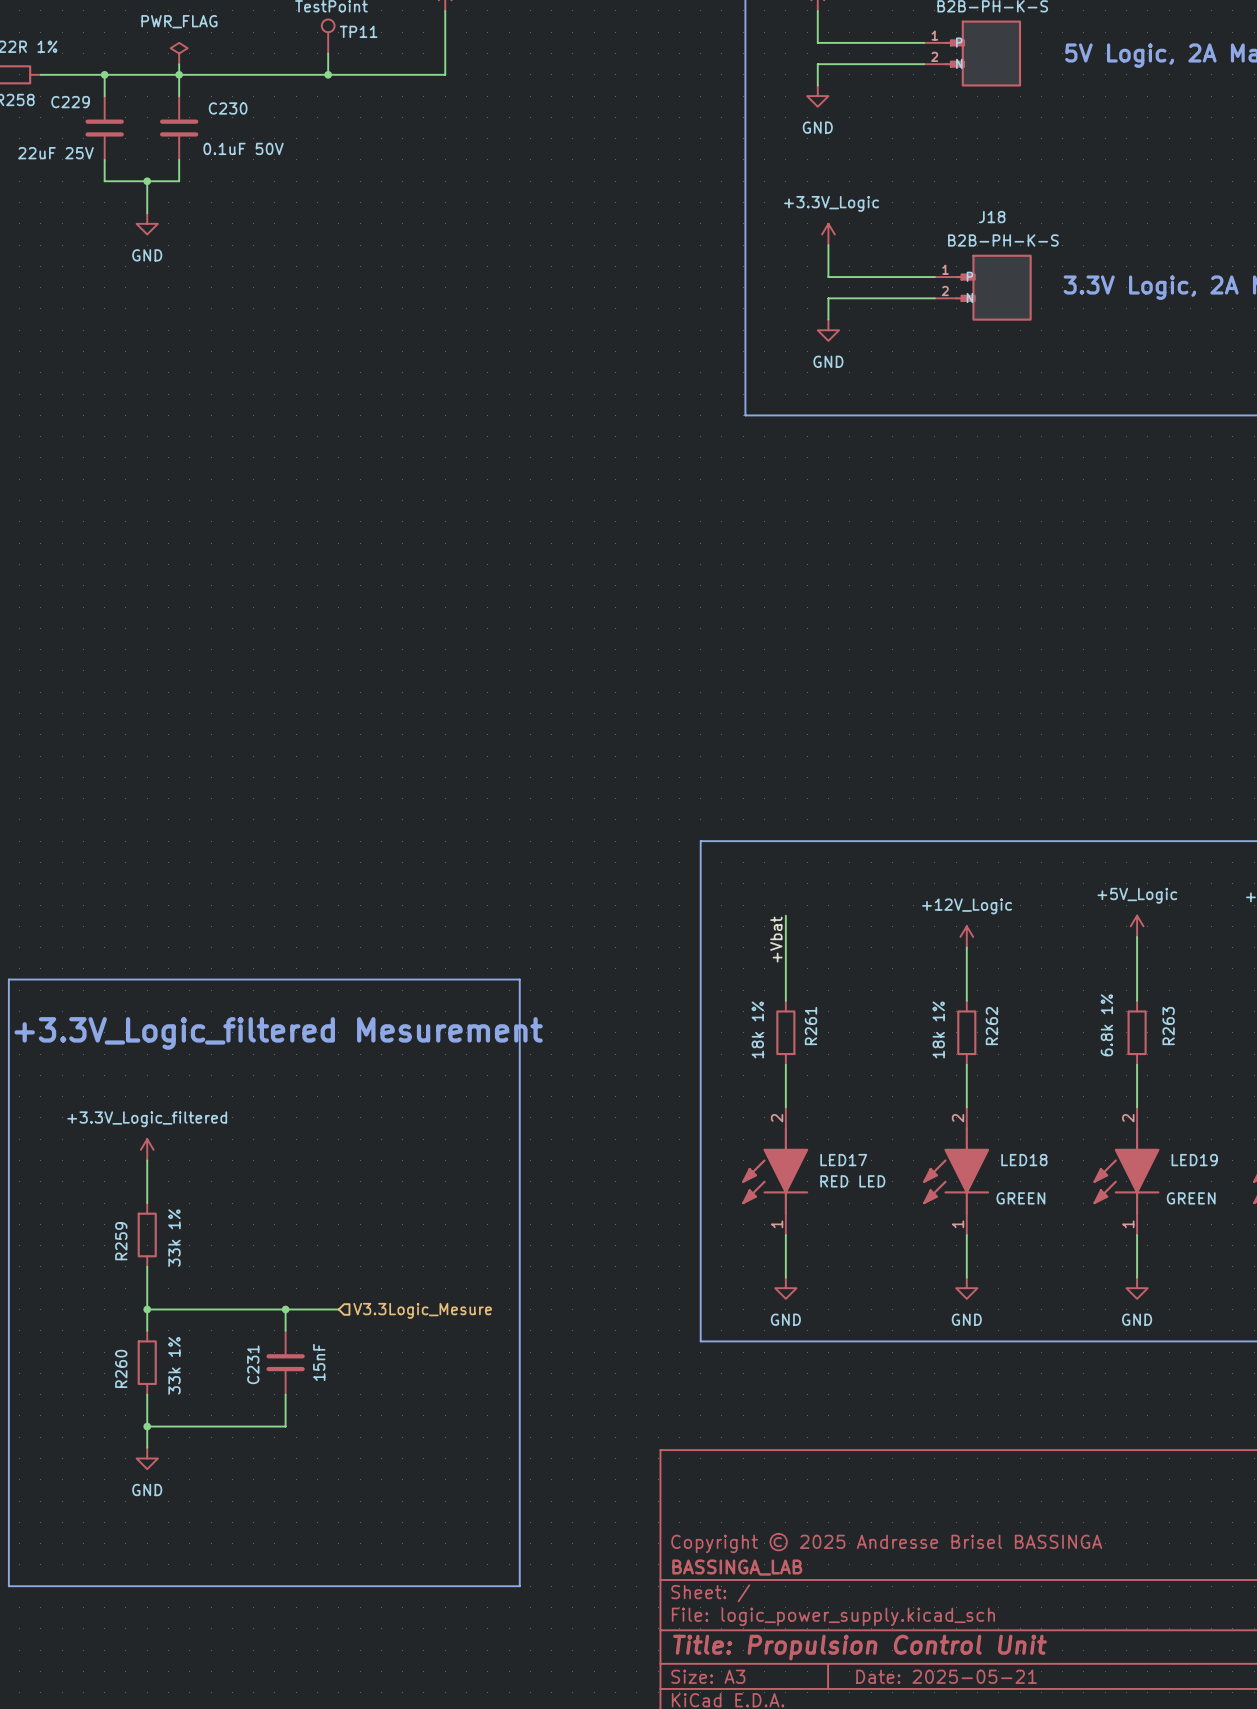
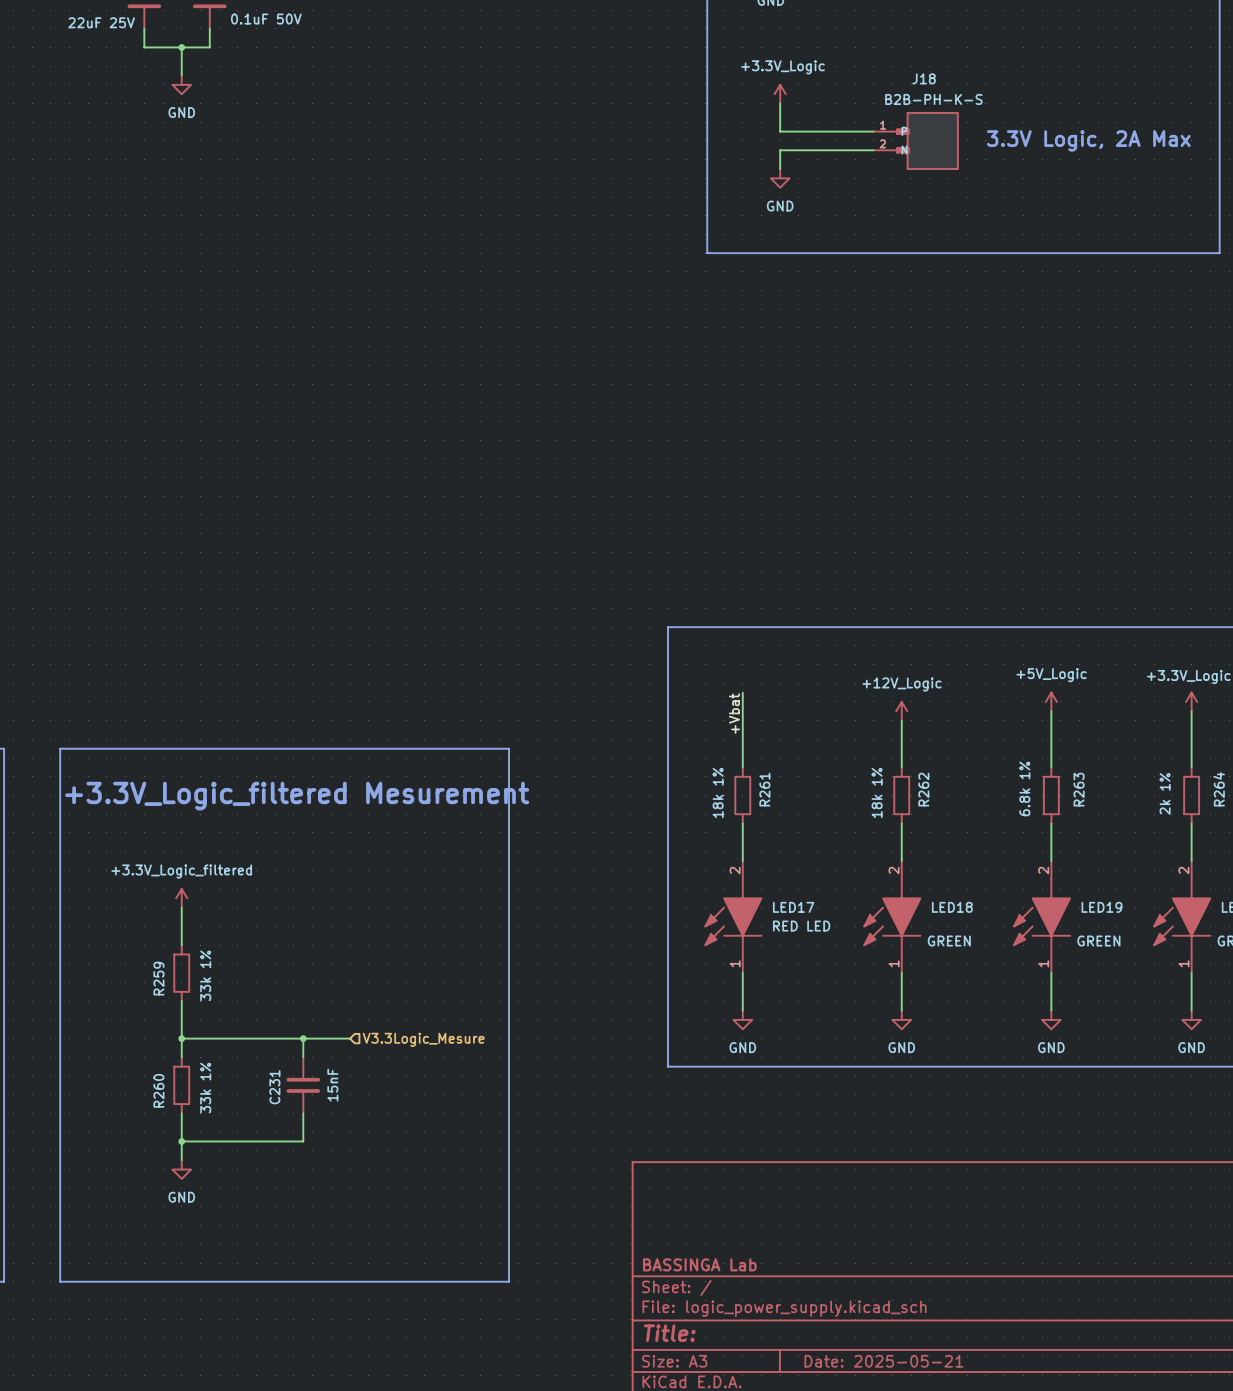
title block: Copyright © 2025 Andresse Brisel BASSINGA (886, 1543) -> none
title block: BASSINGA_LAB (737, 1567) -> BASSINGA Lab (699, 1264)
title block: Title: Propulsion Control Unit (859, 1647) -> Title: (669, 1333)

